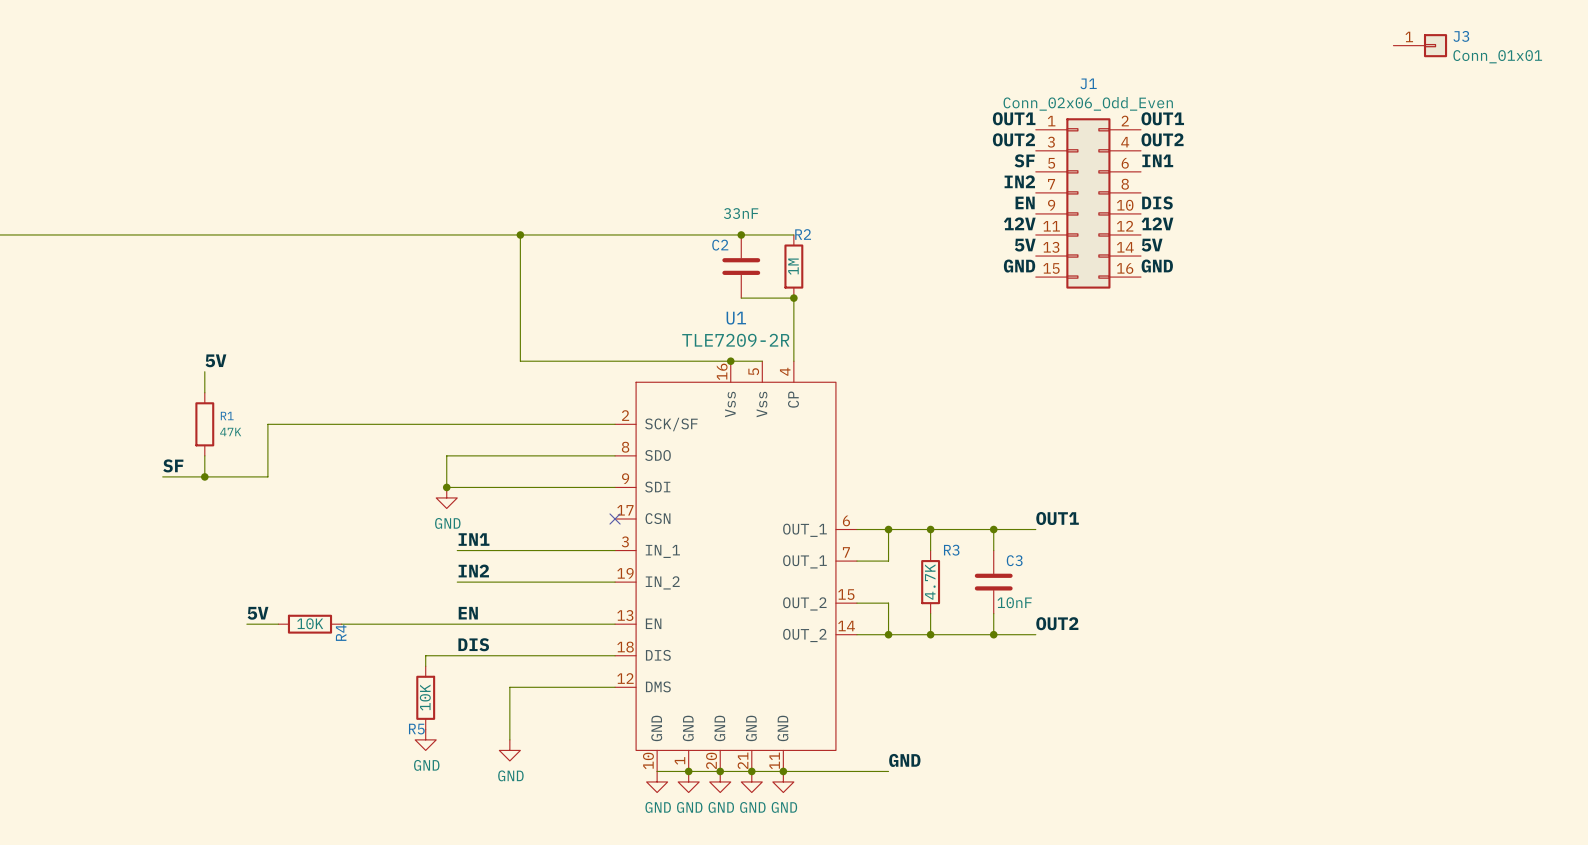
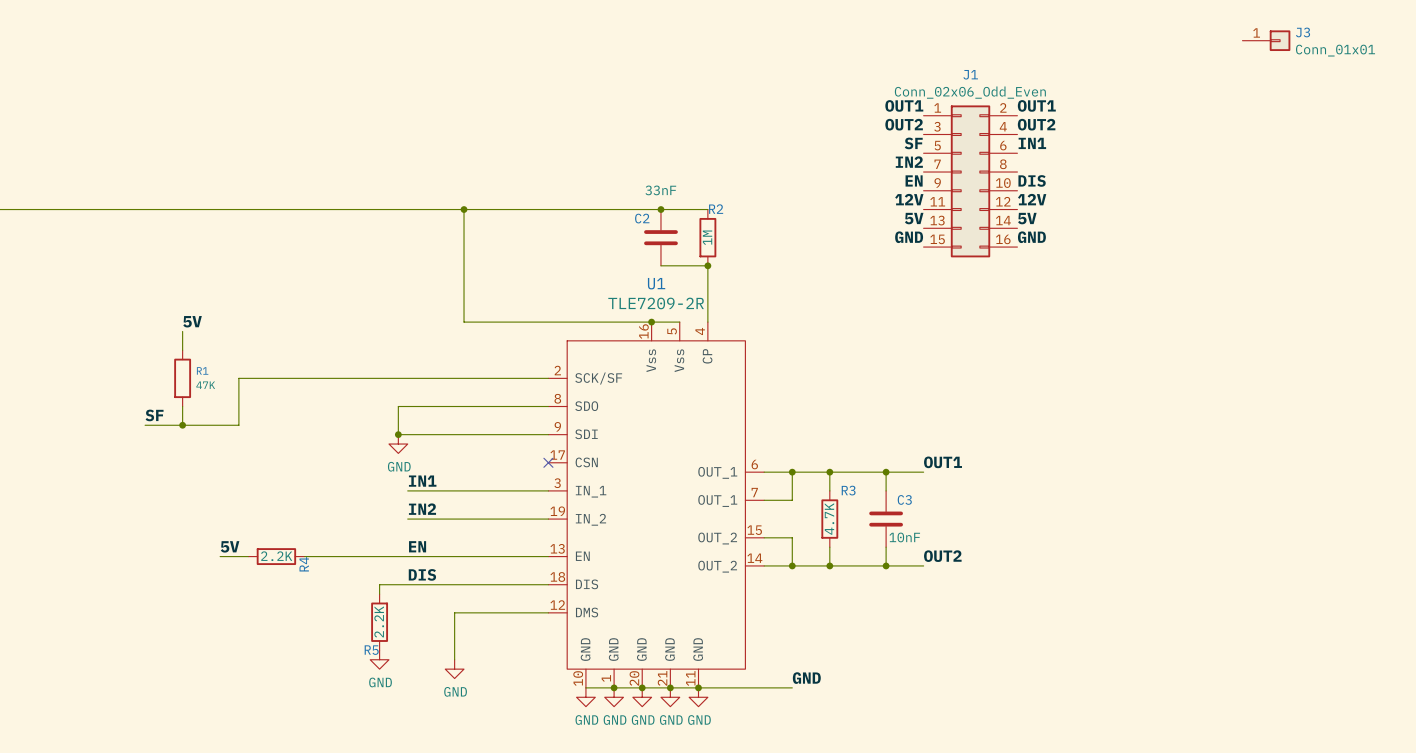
R4 value: 10K (310, 623) -> 2.2K (276, 556)
R5 value: 10K (425, 697) -> 2.2K (379, 621)

